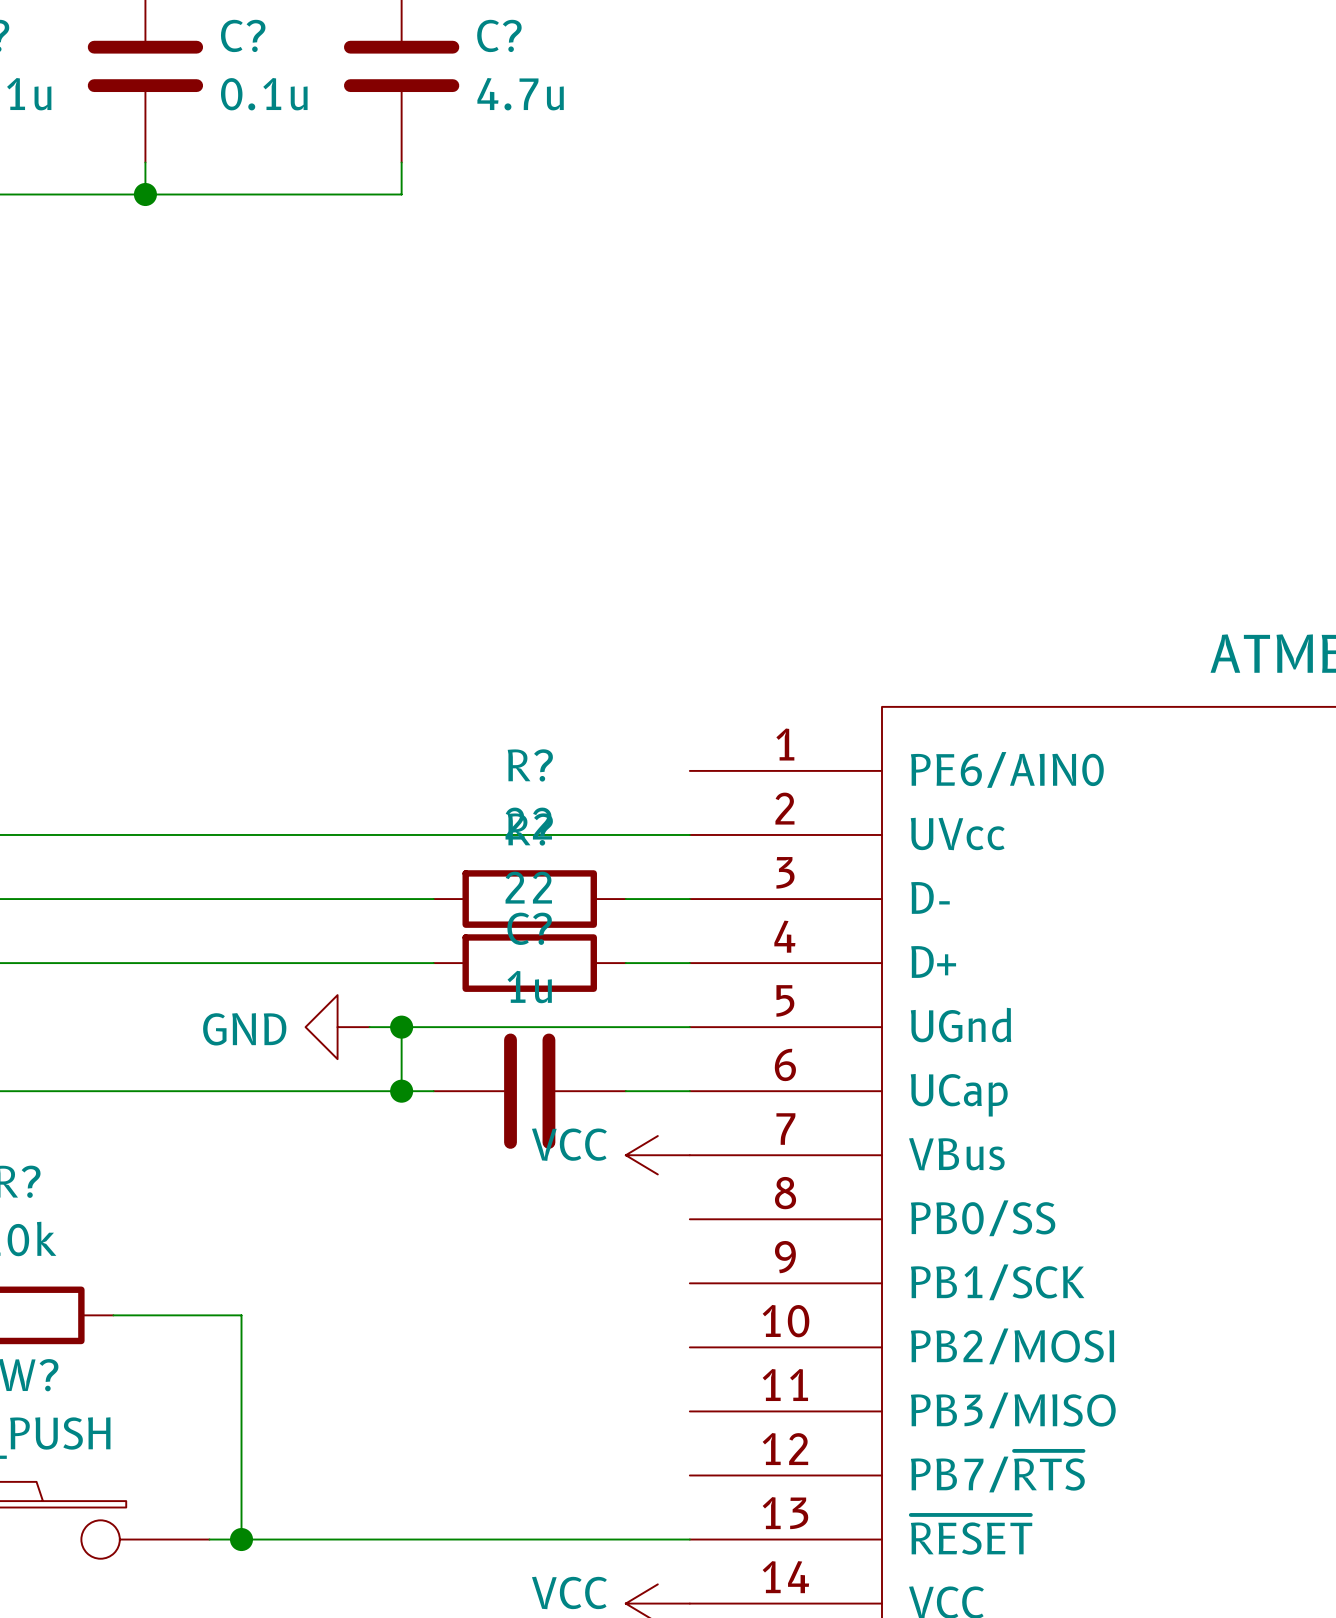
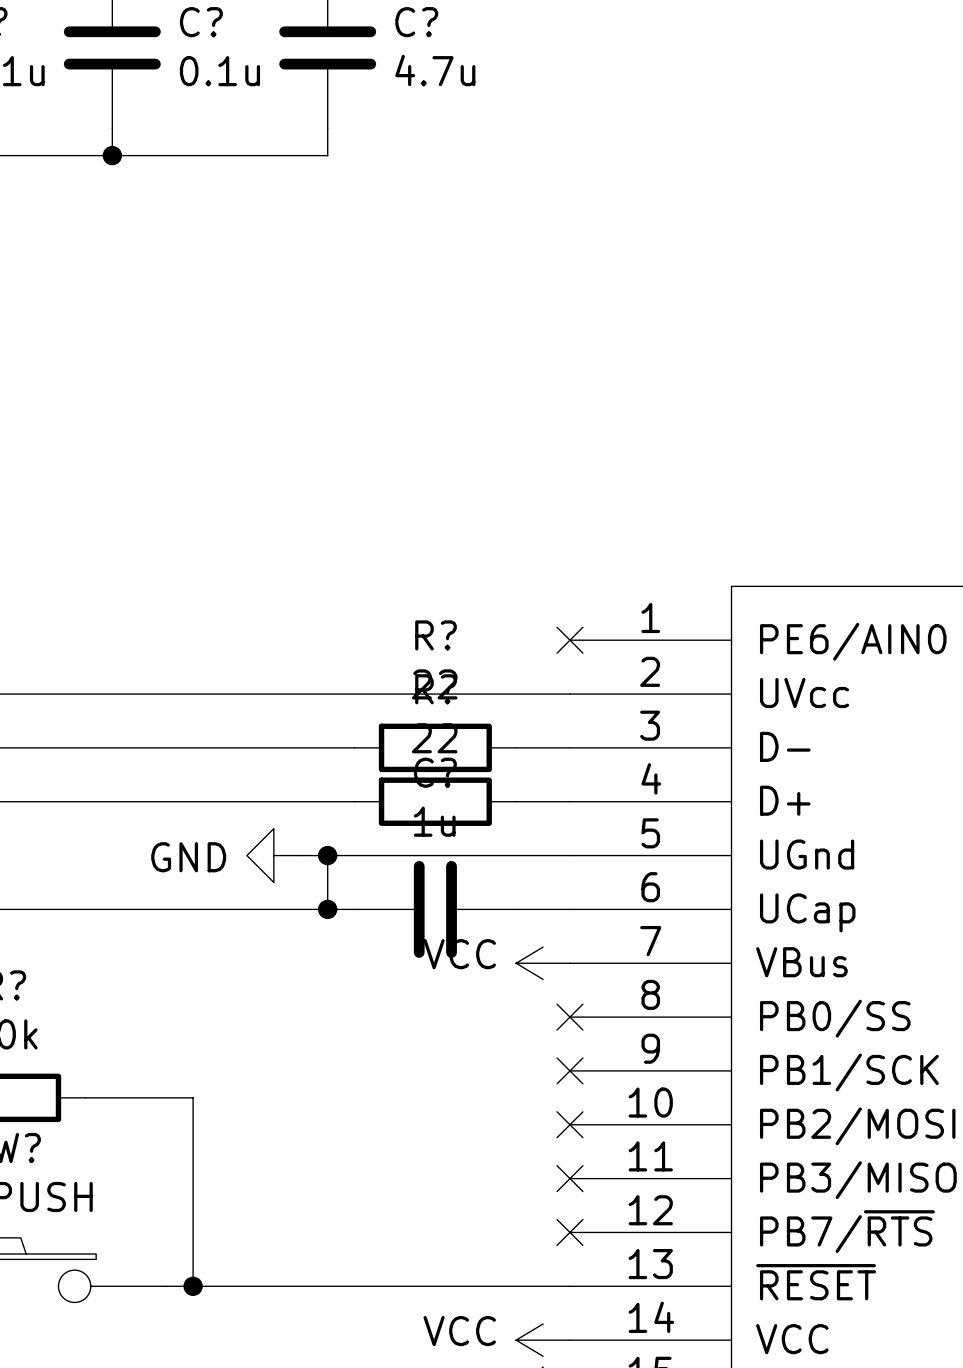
no-connect mark: none -> (569, 640)
no-connect mark: none -> (569, 1017)
no-connect mark: none -> (569, 1070)
no-connect mark: none -> (569, 1124)
no-connect mark: none -> (569, 1178)
no-connect mark: none -> (569, 1232)

